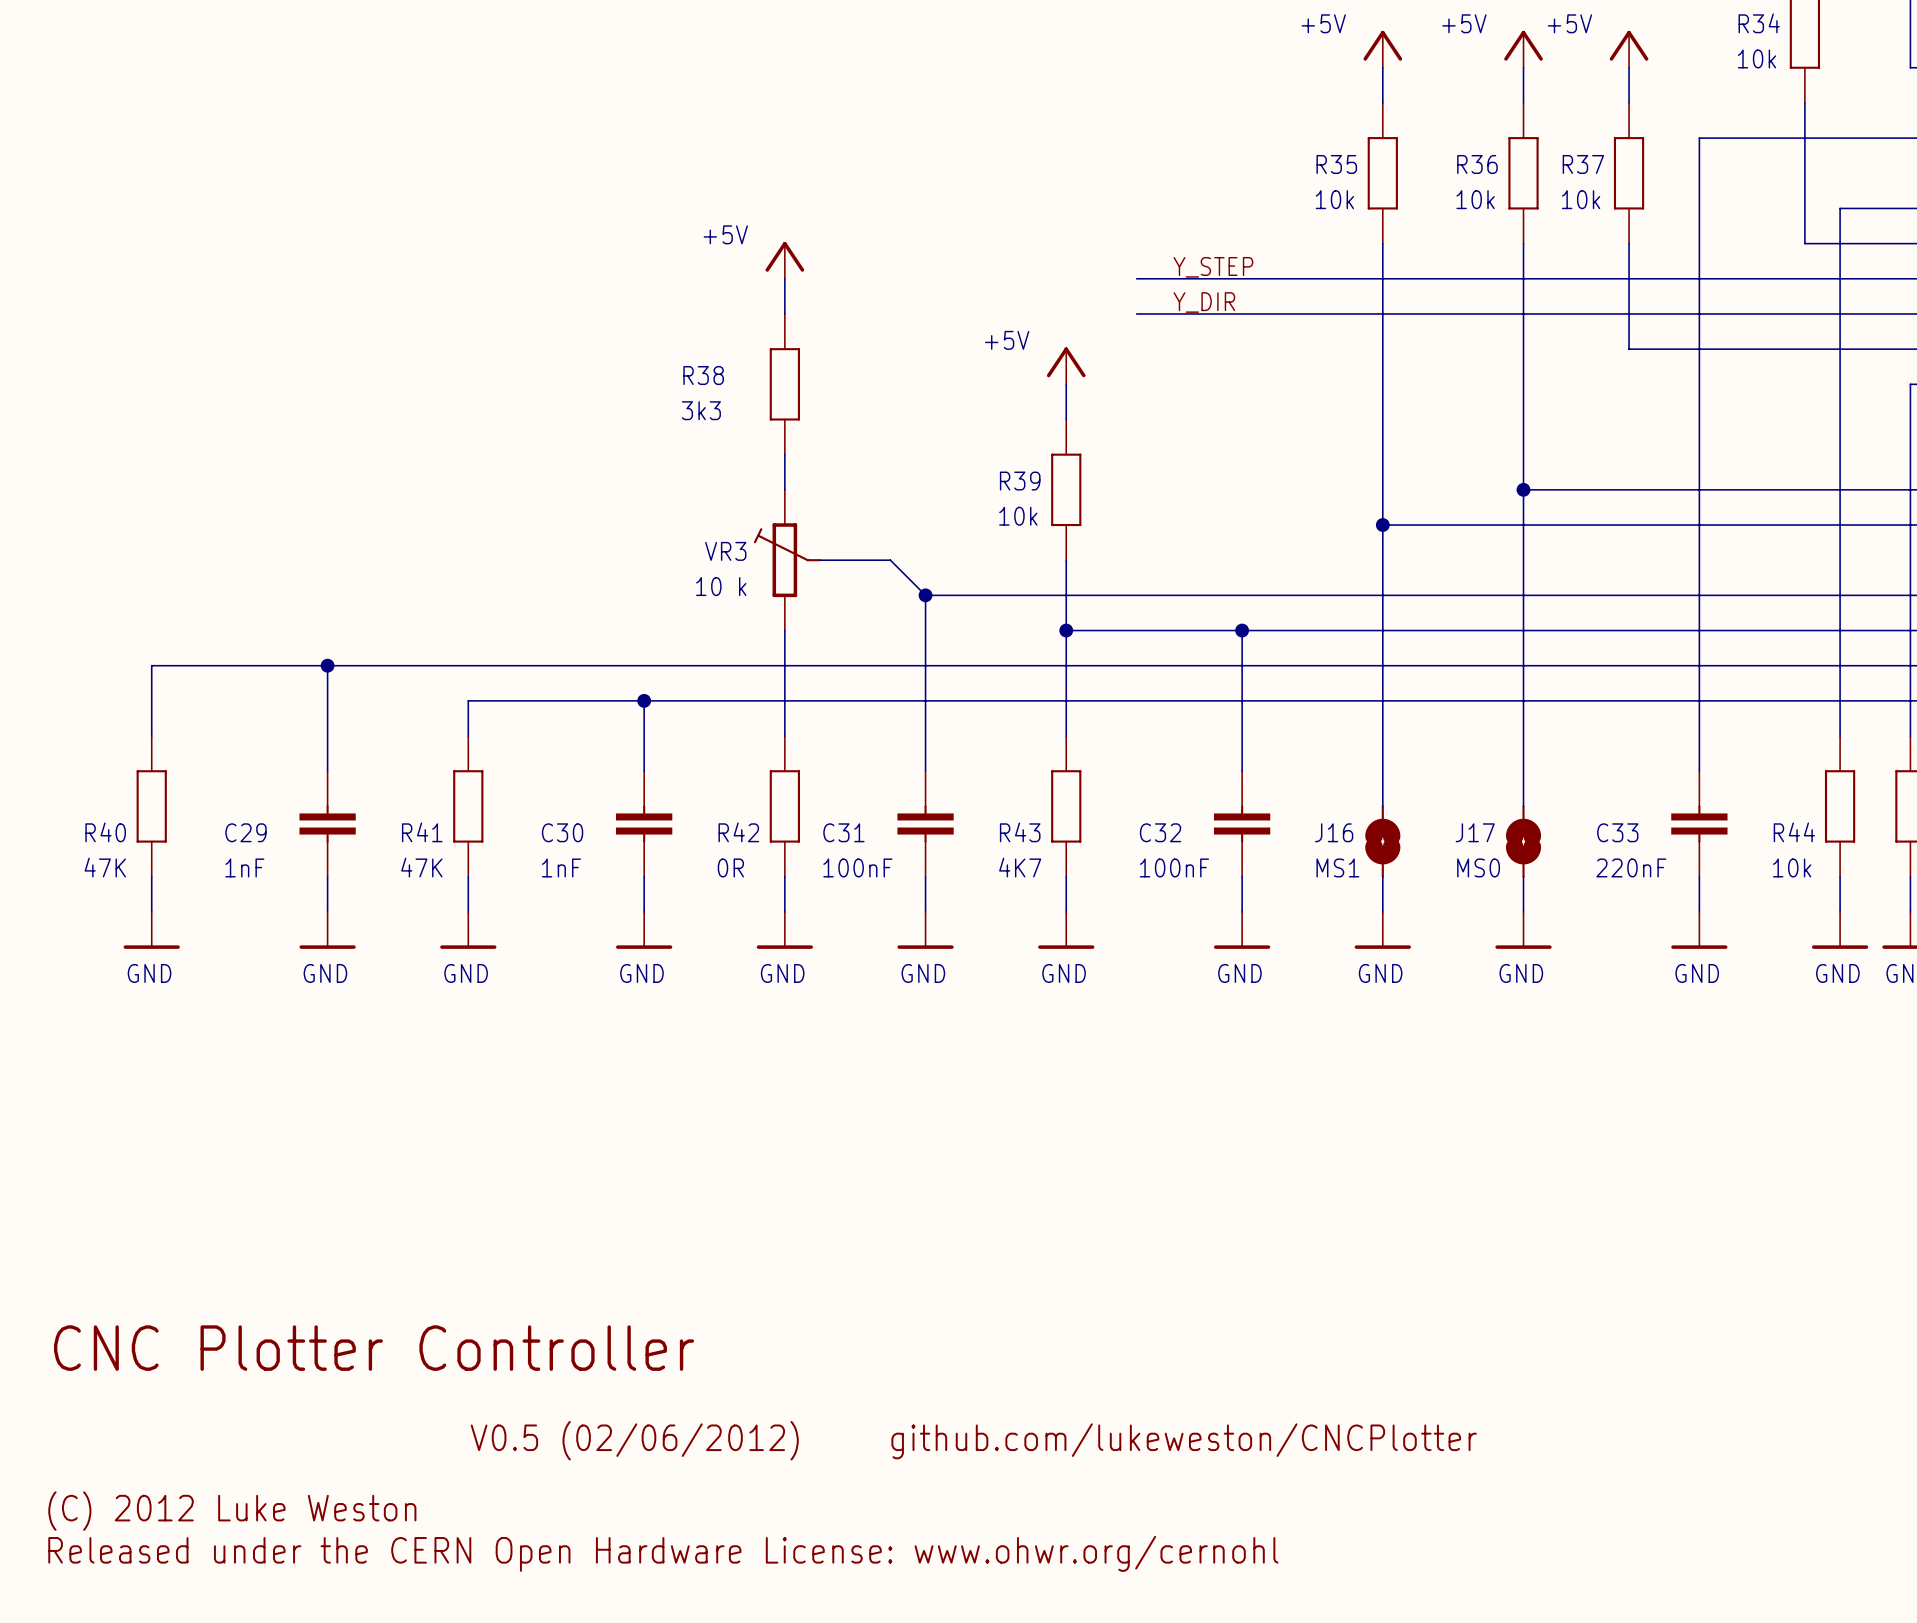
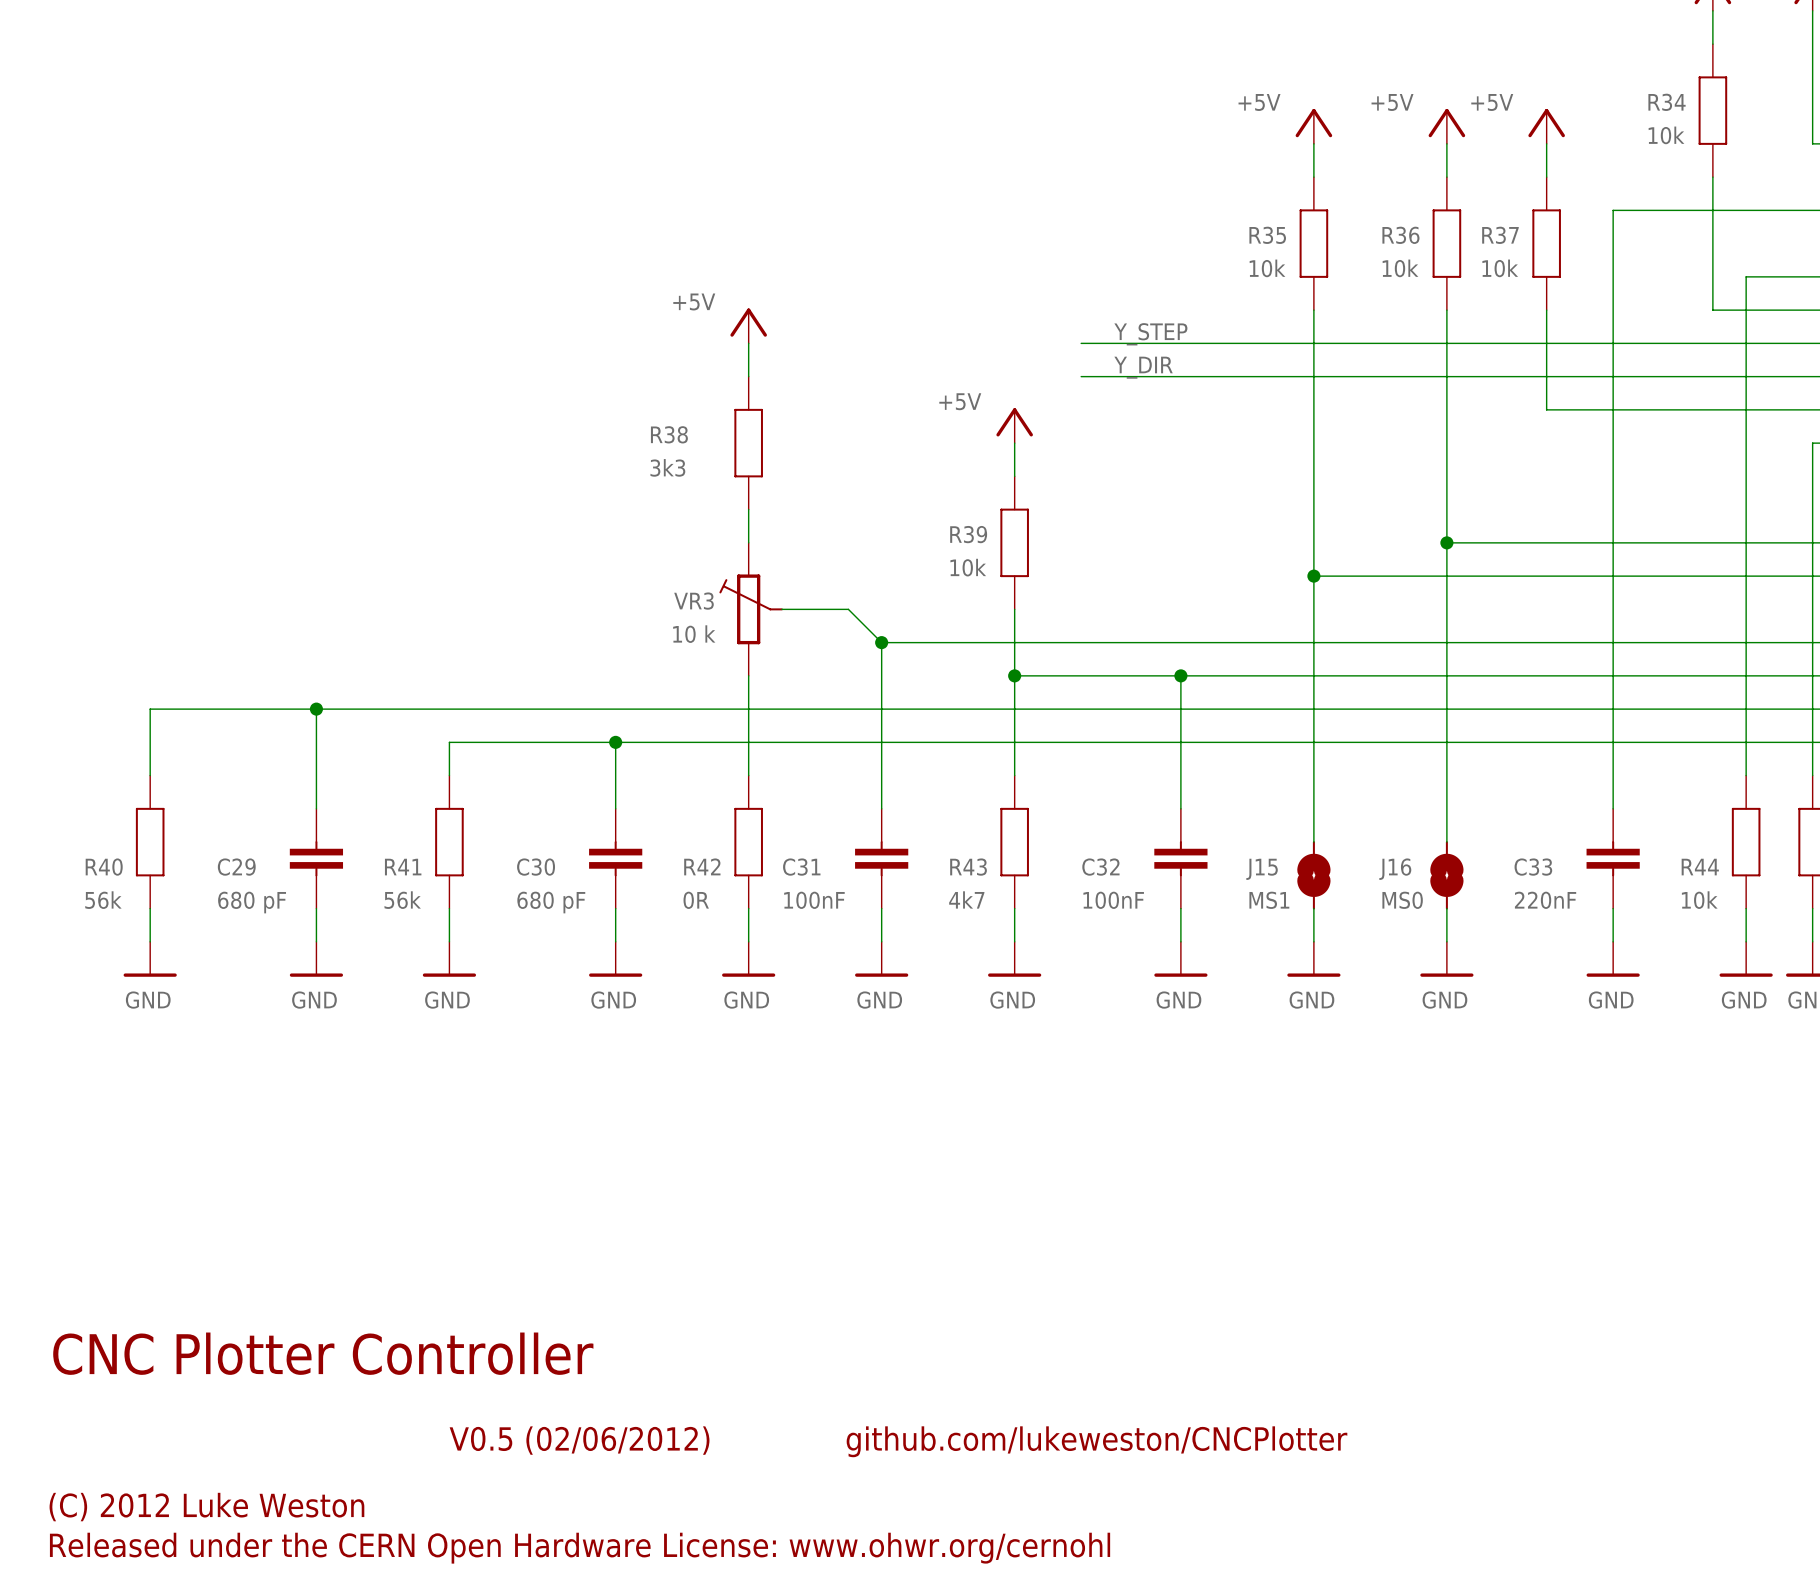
J16 name: J16 (1334, 832) -> J15 (1262, 869)
J17 name: J17 (1475, 832) -> J16 (1395, 869)
R40 value: 47K (105, 867) -> 56k (103, 900)
C29 value: 1nF (244, 867) -> 680 pF (252, 902)
R41 value: 47K (421, 867) -> 56k (402, 900)
C30 value: 1nF (561, 867) -> 680 pF (551, 902)
R43 value: 4K7 (1020, 867) -> 4k7 (966, 899)

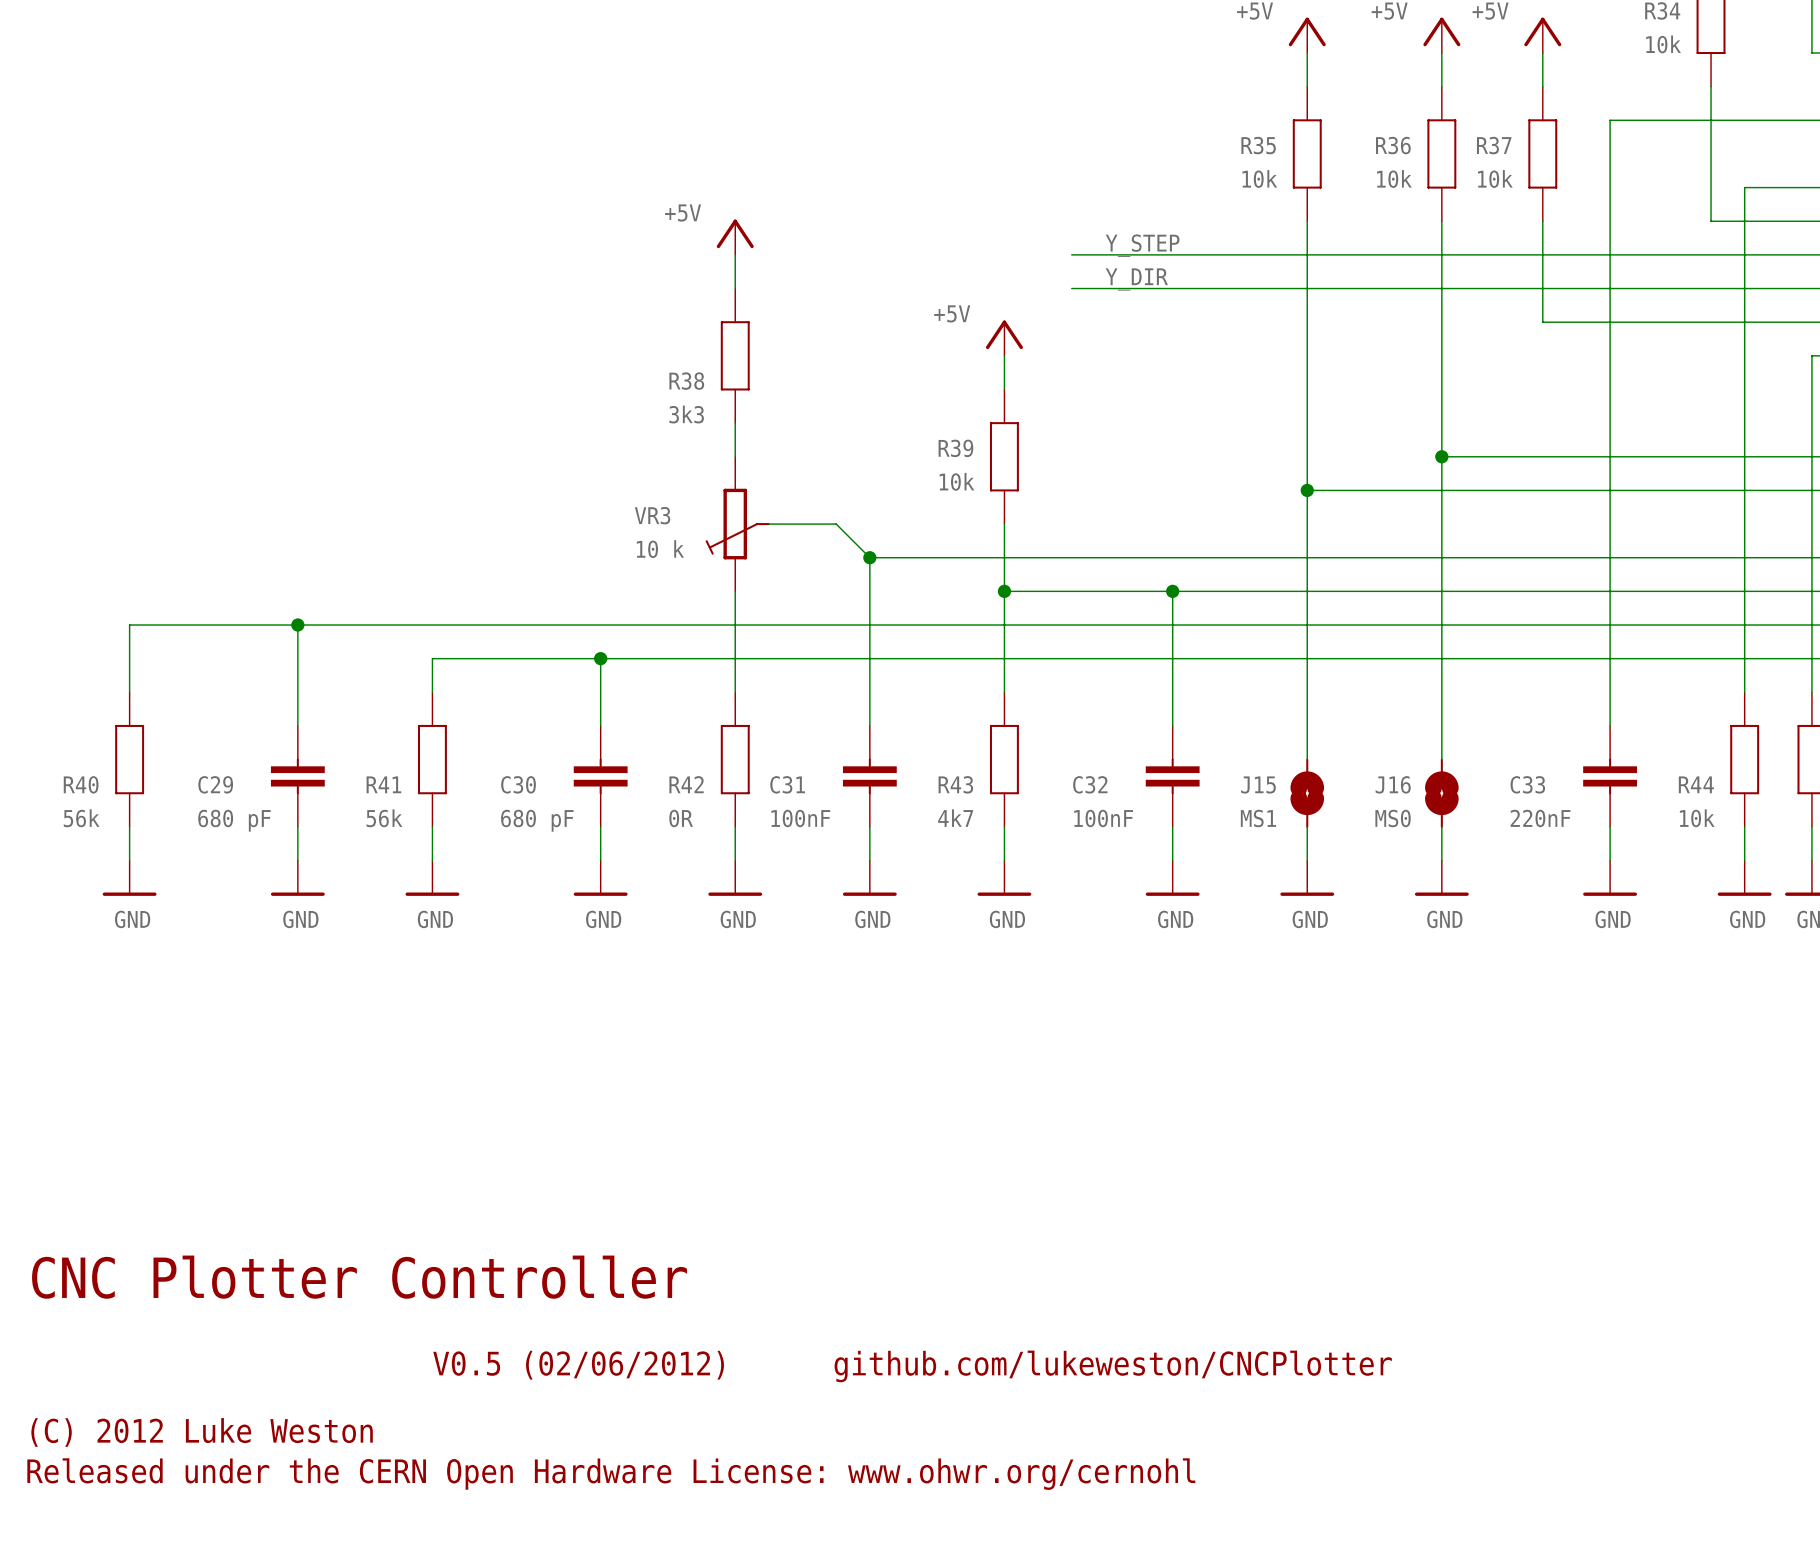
R38 name position: R38 (669, 434) -> R38 (686, 381)
R38 value position: 3k3 (667, 467) -> 3k3 (686, 414)
VR3 flip: as is (751, 609) -> up-down (737, 524)

